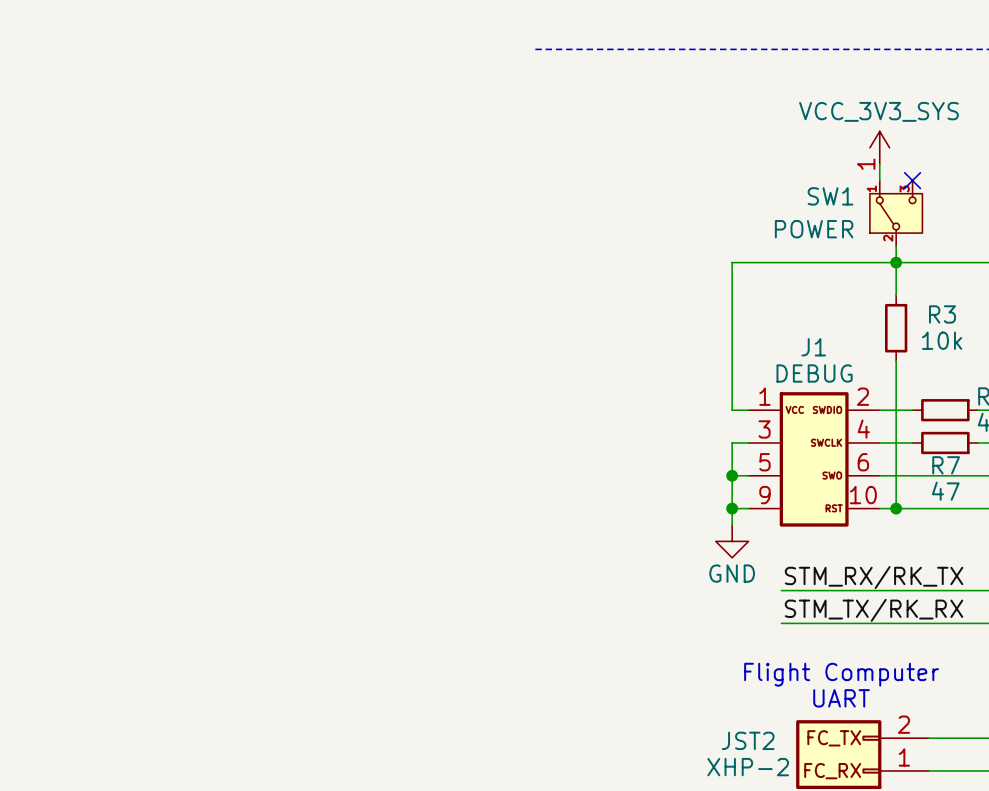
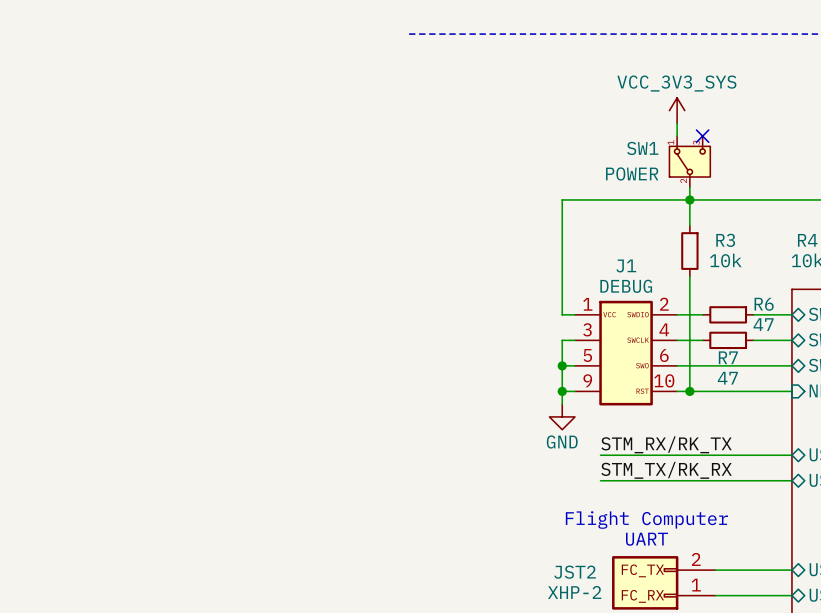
power symbol pin number: 1 (866, 164) -> none

